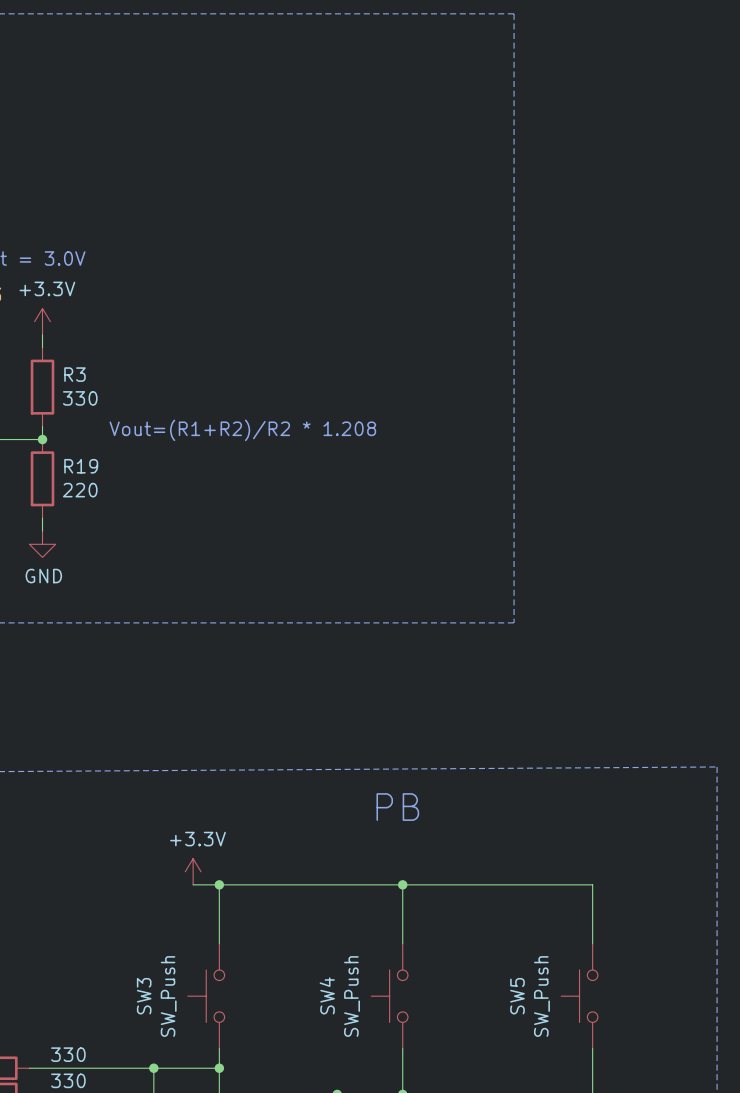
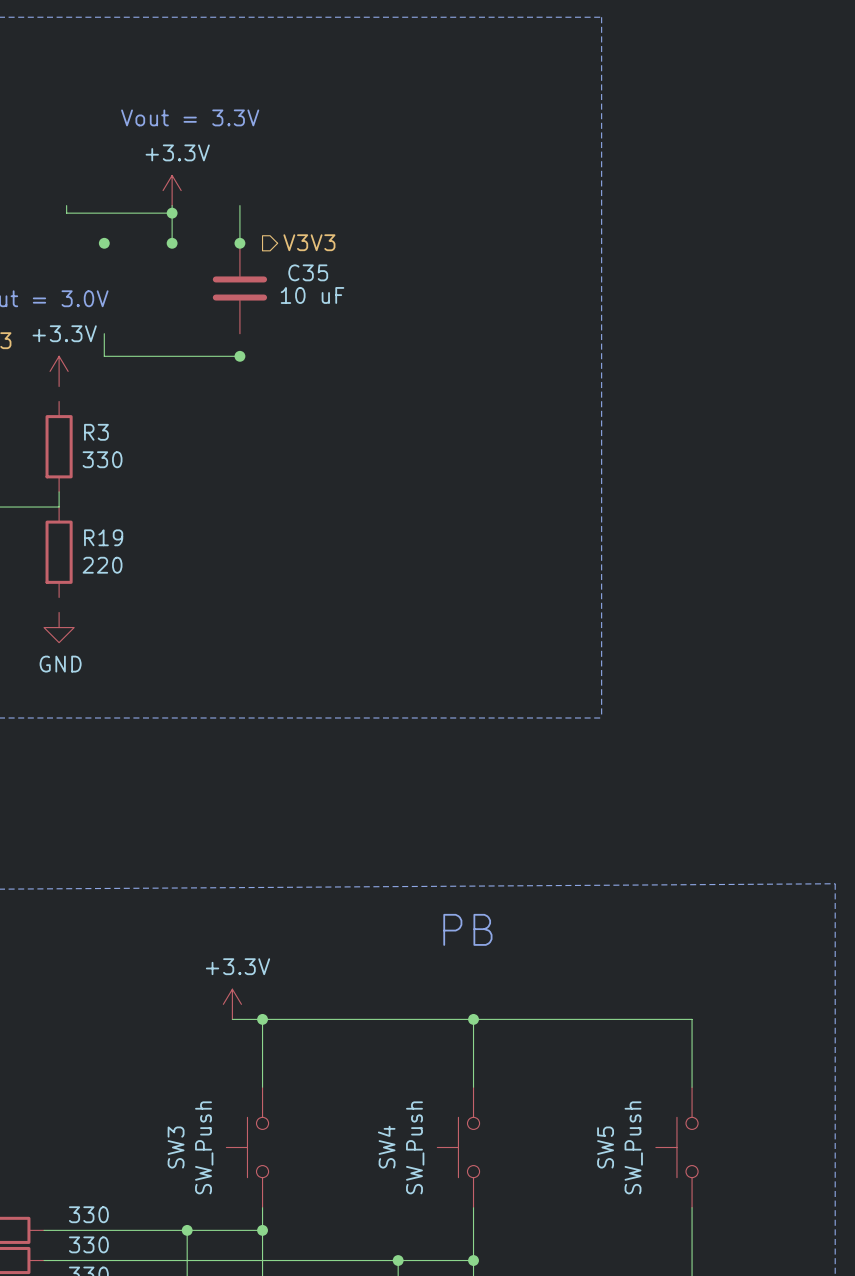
text: none -> Vout = 3.3V (190, 117)
power symbol: none -> +3.3V (172, 190)
wire: none -> (66, 205) (66, 213) (172, 213)
wire: none -> (172, 205) (172, 243)
wire: none -> (239, 205) (239, 243)
junction: none -> (172, 213)
hierarchical label: none -> V3V3 (309, 242)
junction: none -> (104, 243)
junction: none -> (172, 243)
junction: none -> (239, 243)
C35: none -> 10 uF (239, 288)
wire: none -> (104, 333) (104, 356) (239, 356)
junction: none -> (239, 356)
wire: (42, 334) (42, 347) -> none
text: Vout=(R1+R2)/R2 * 1.208 (242, 430) -> none
junction: (42, 439) -> none
wire: (42, 518) (42, 531) -> none

